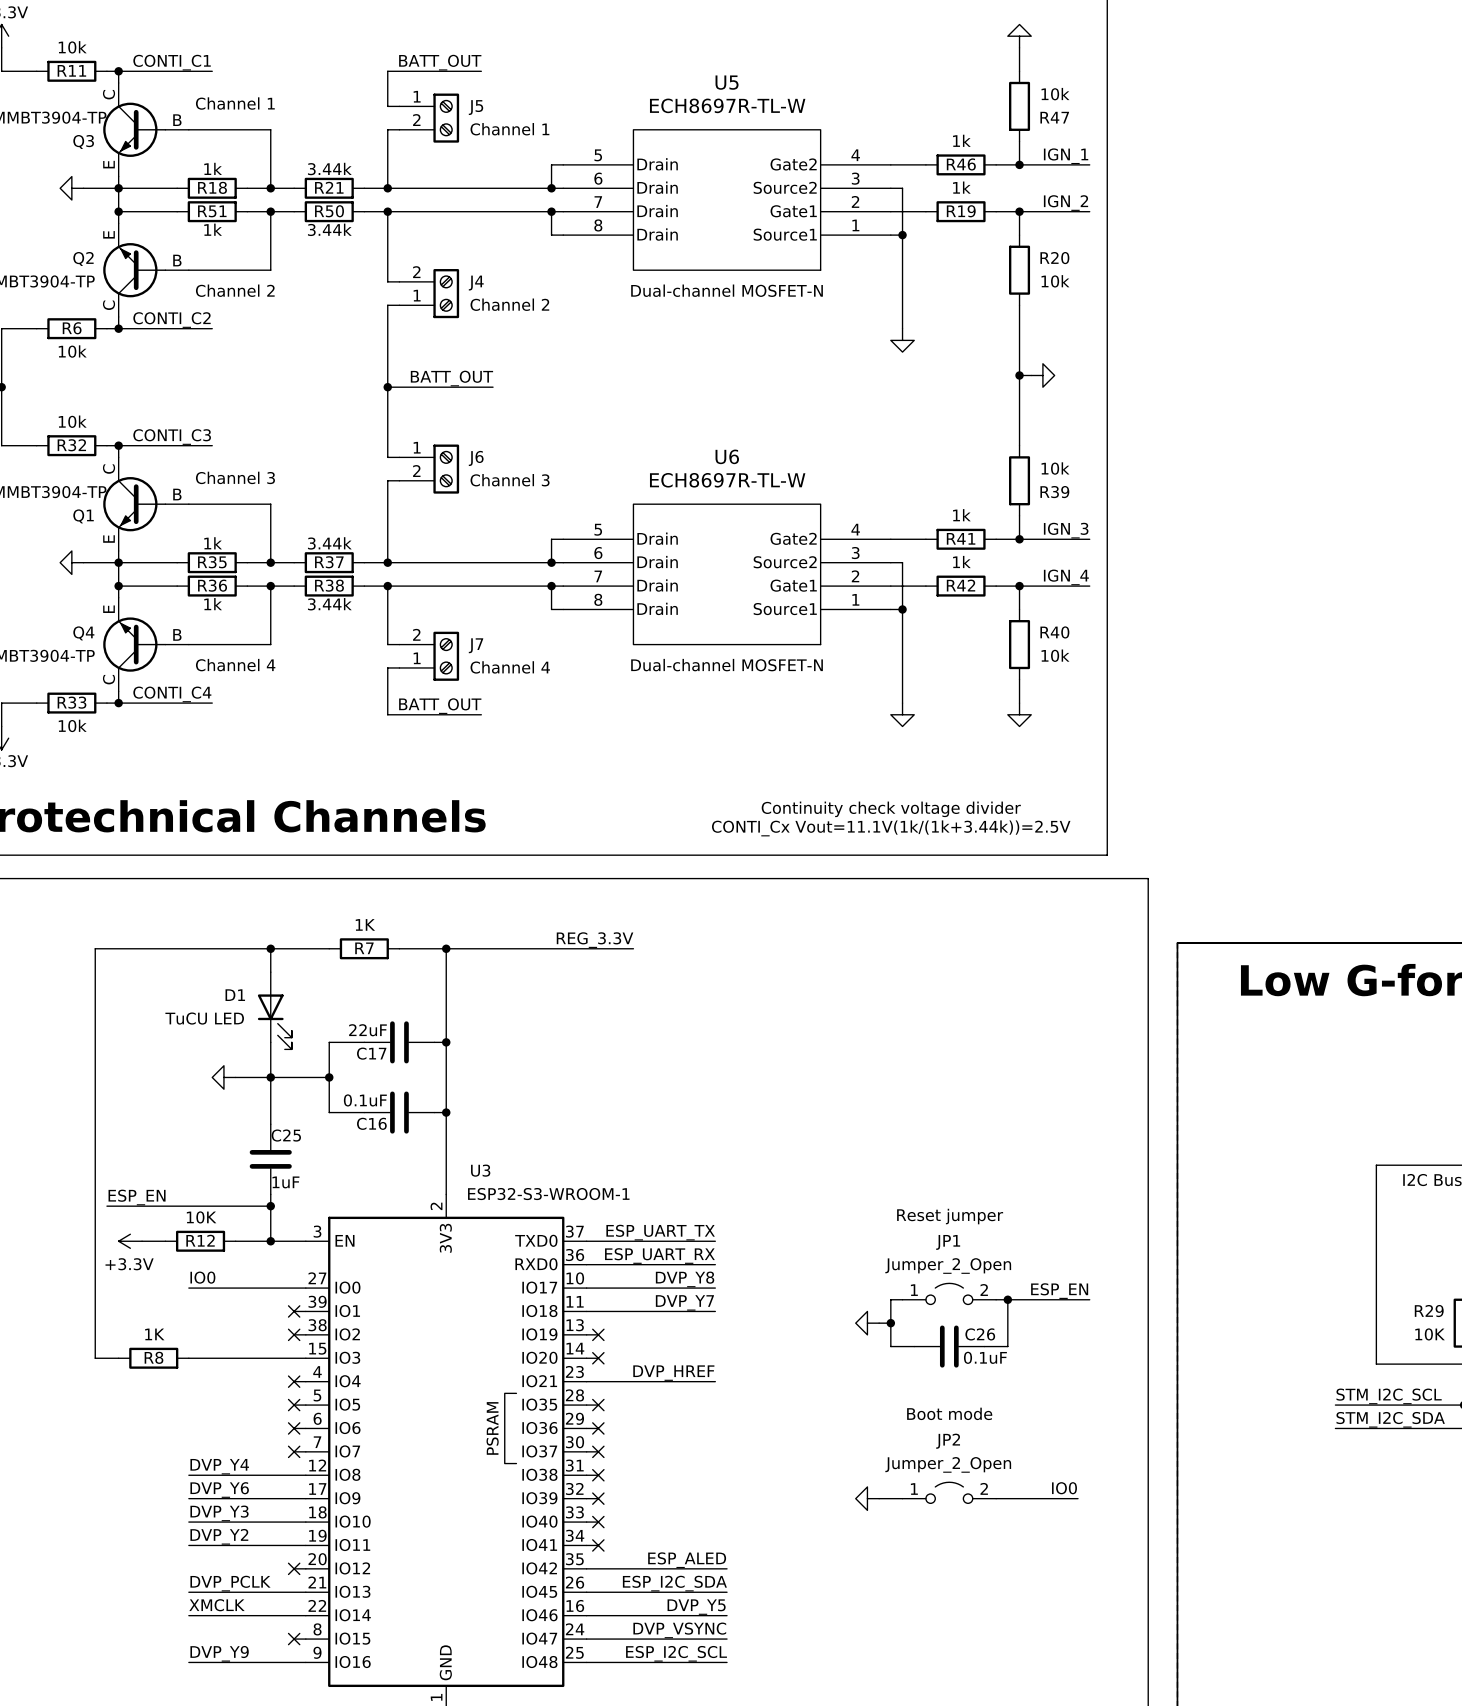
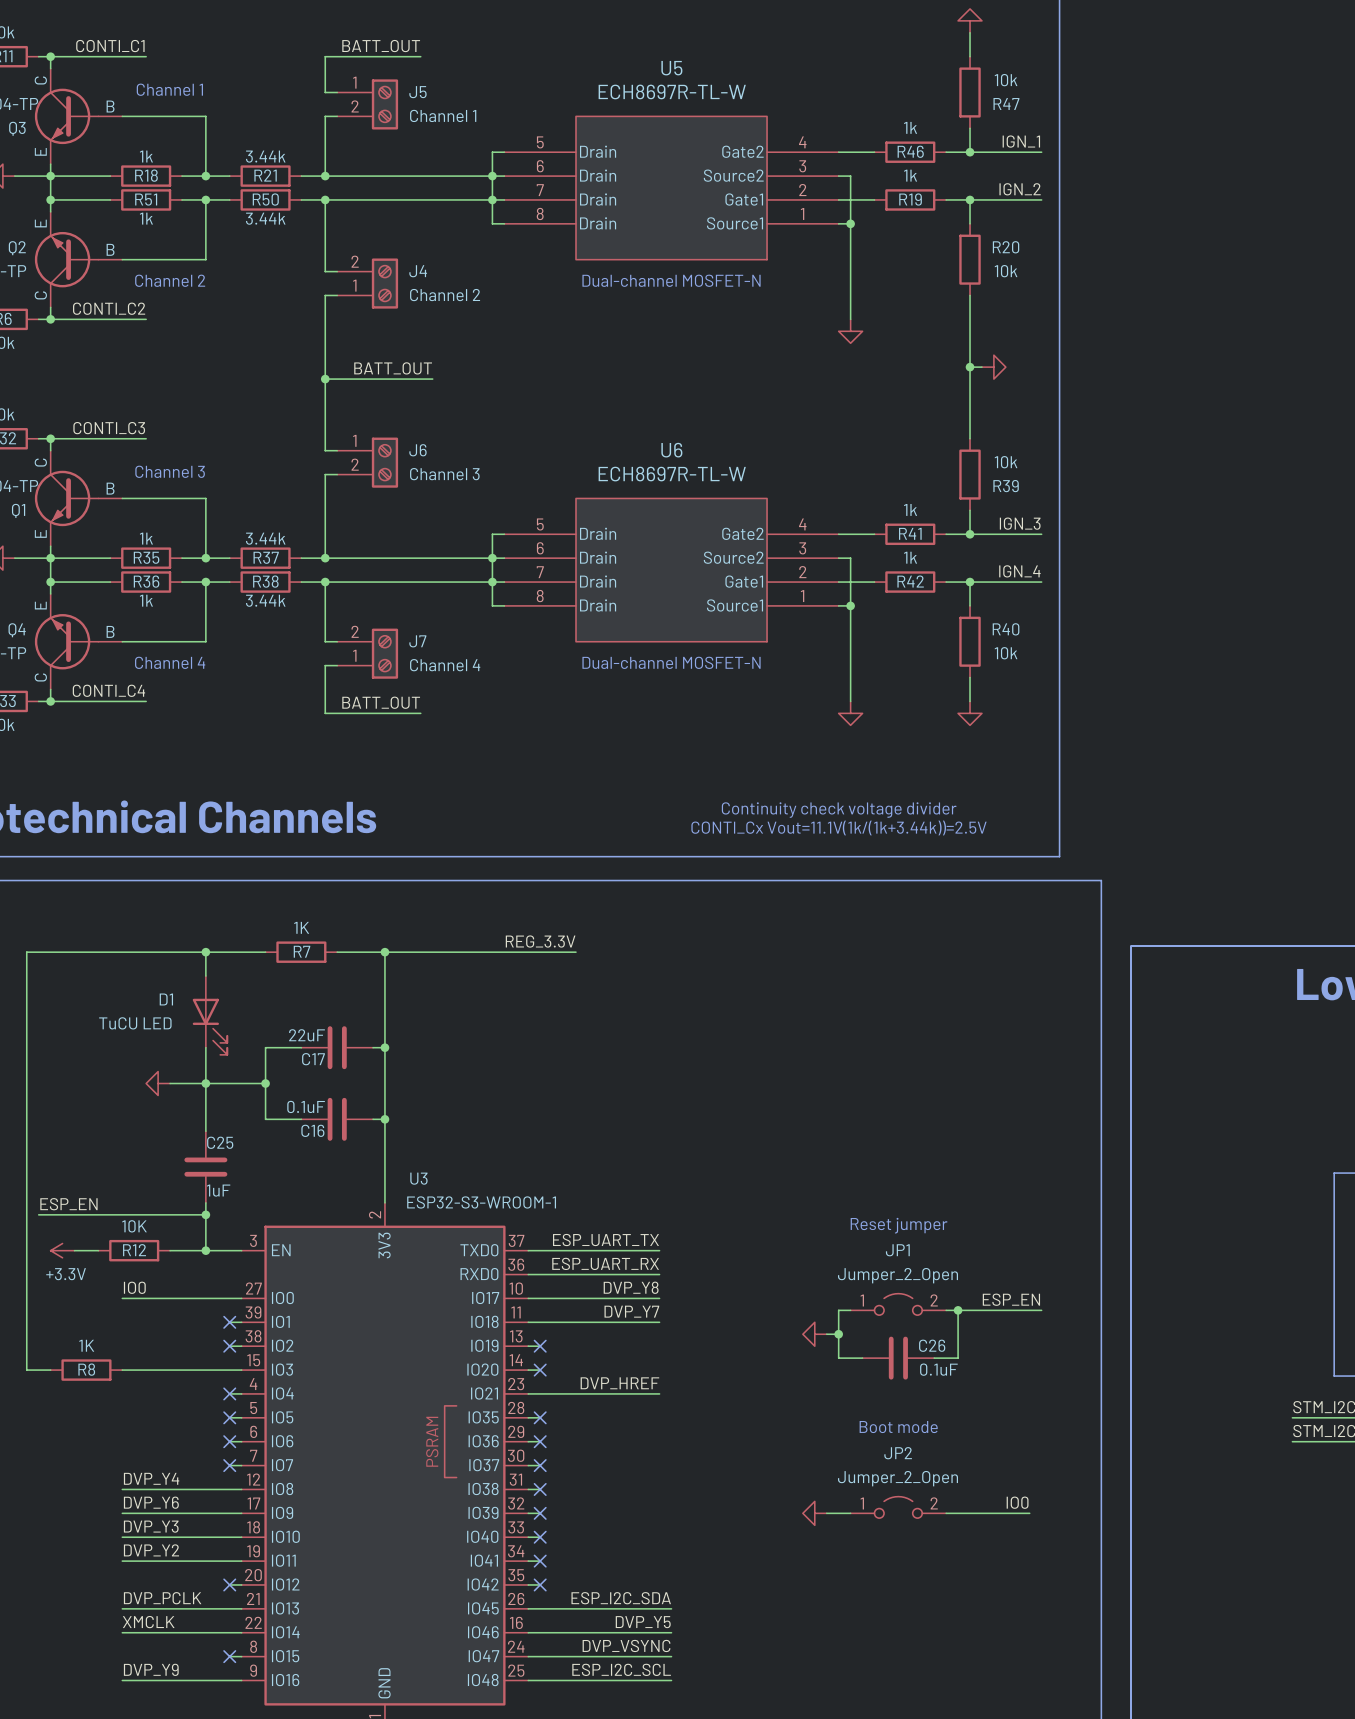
wire: none -> (492, 176) (492, 199)
wire: none -> (492, 558) (492, 582)
label: ESP_ALED (687, 1560) -> none
wire: (598, 1568) (727, 1568) -> none
no-connect mark: none -> (540, 1584)

